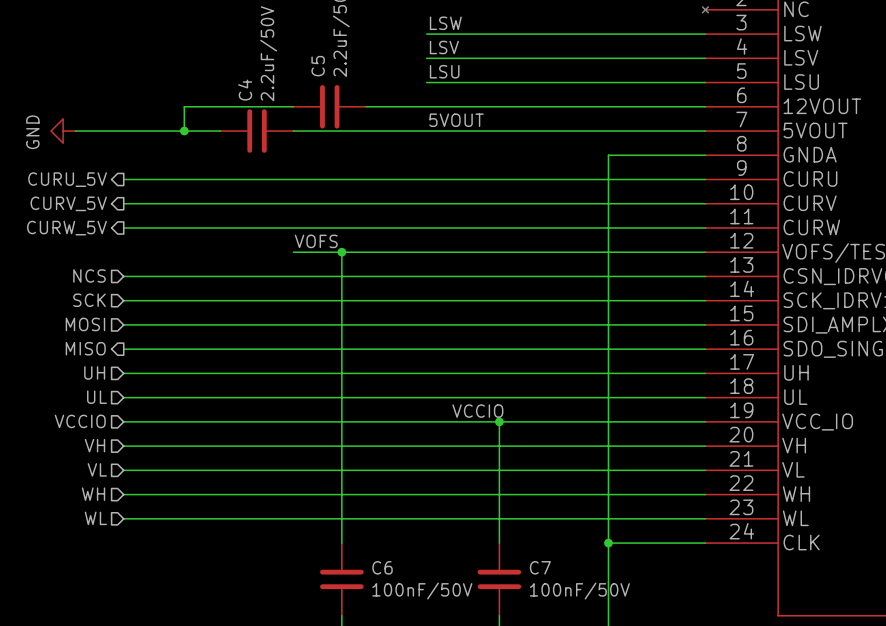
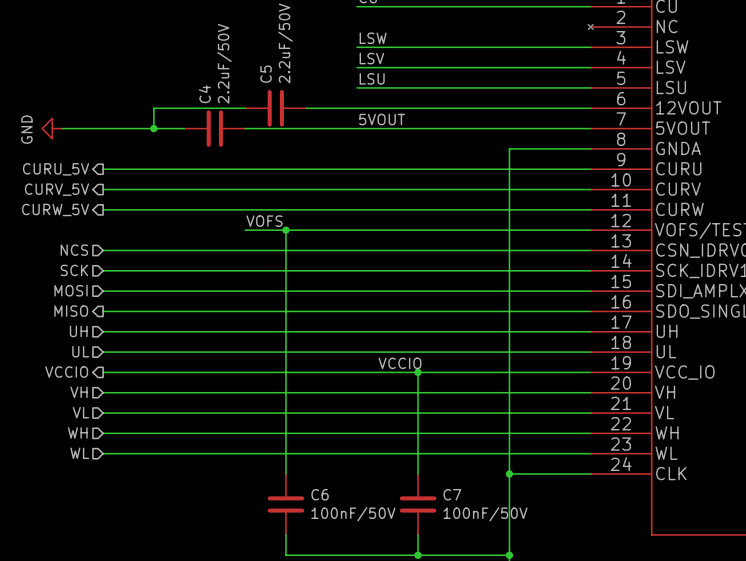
hierarchical label shape: input (80, 421) -> output (66, 372)

